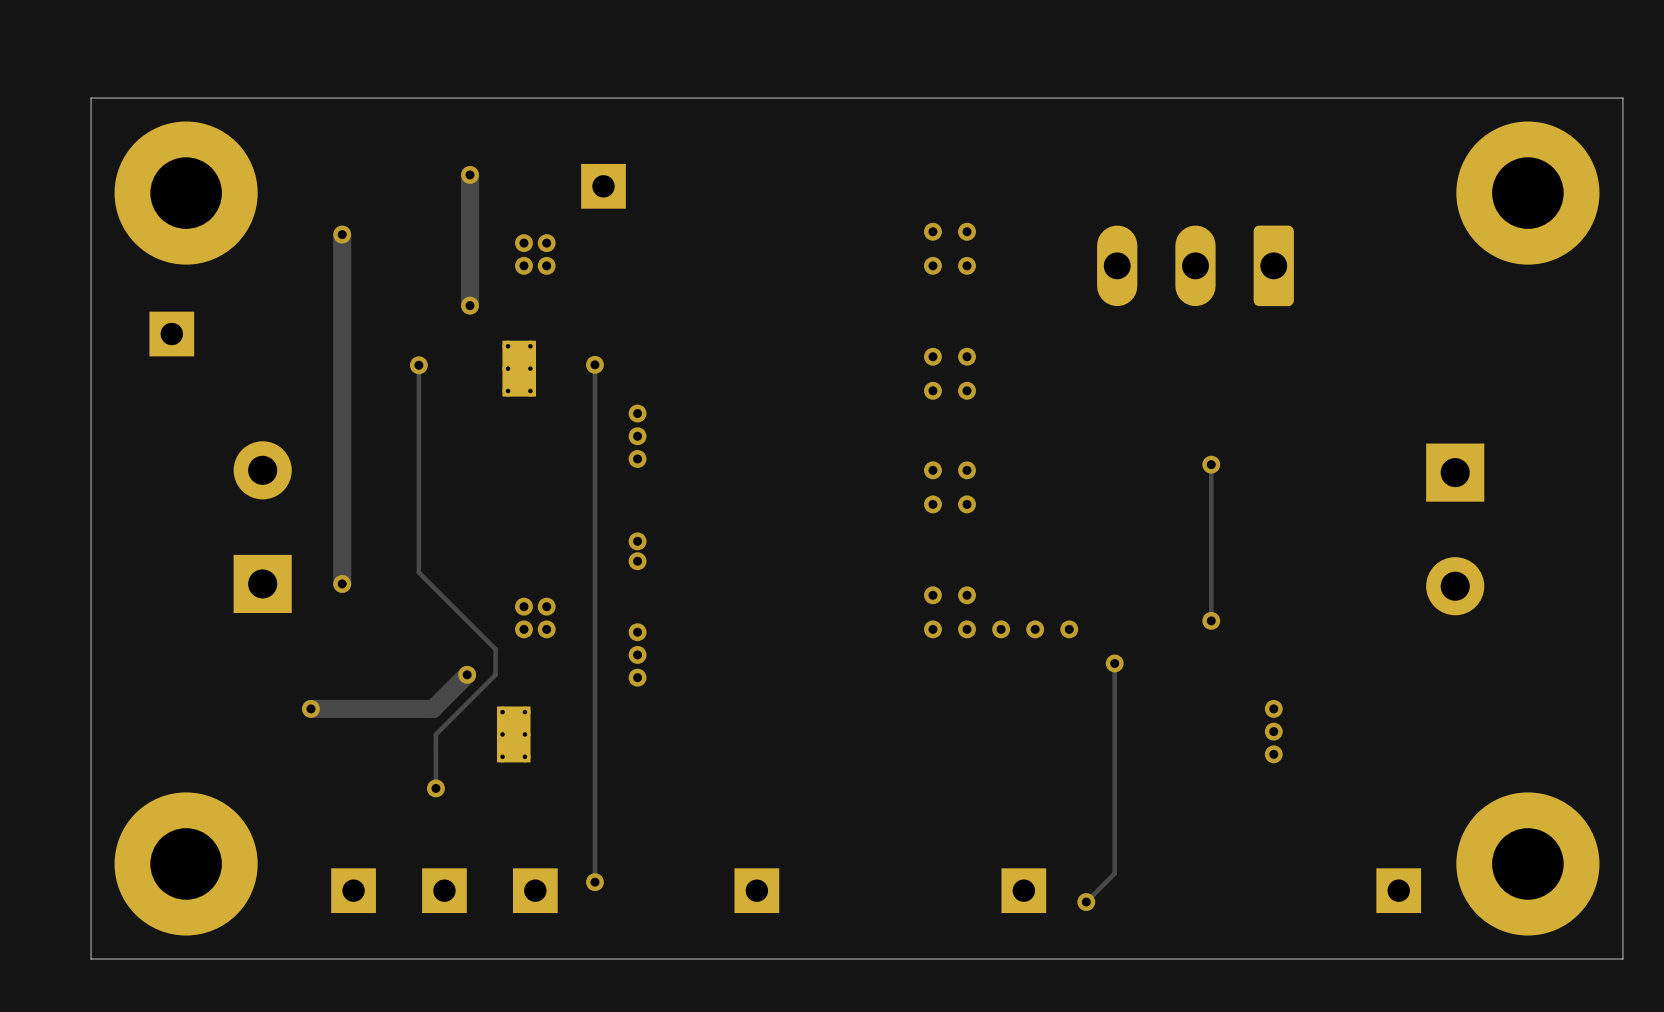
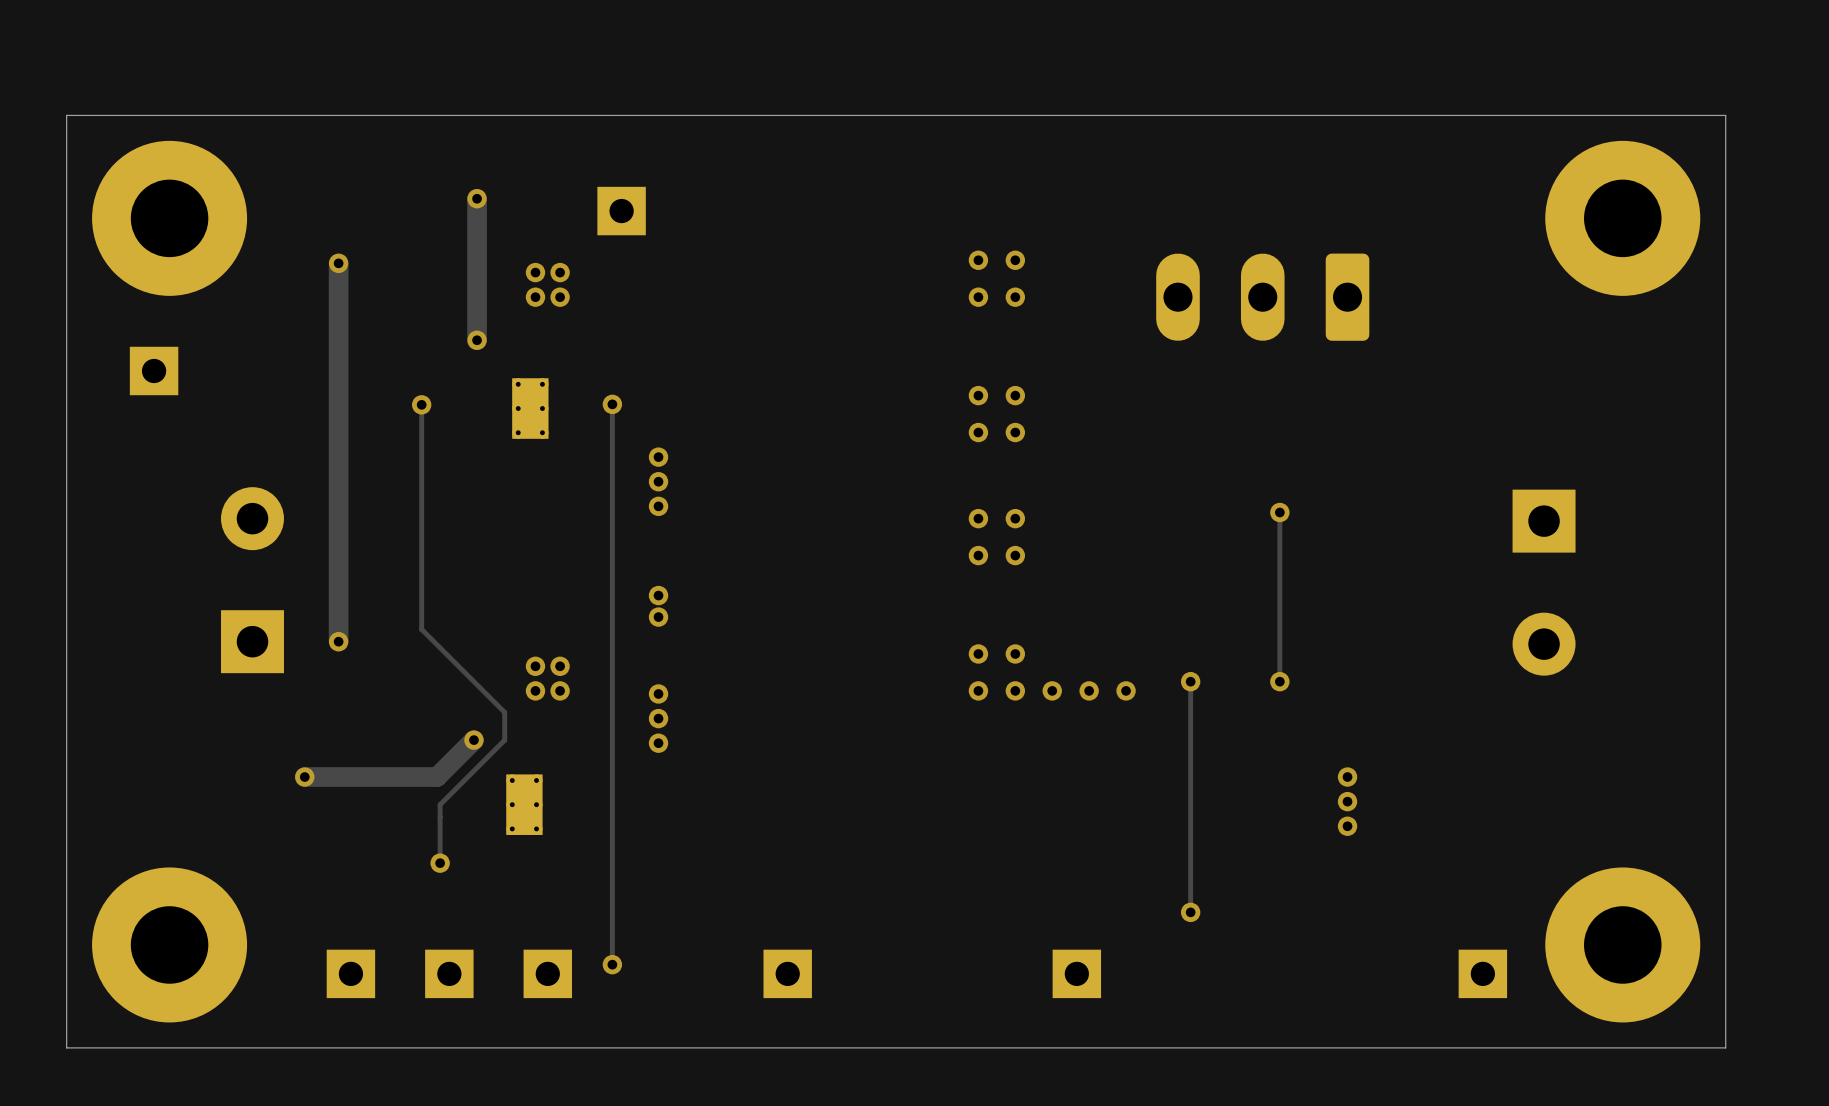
track: none -> (1190, 681) (1190, 912)
track: (1114, 663) (1114, 873) (1086, 902) -> none
via position: (1114, 663) -> (1190, 681)
via position: (1086, 902) -> (1190, 912)

